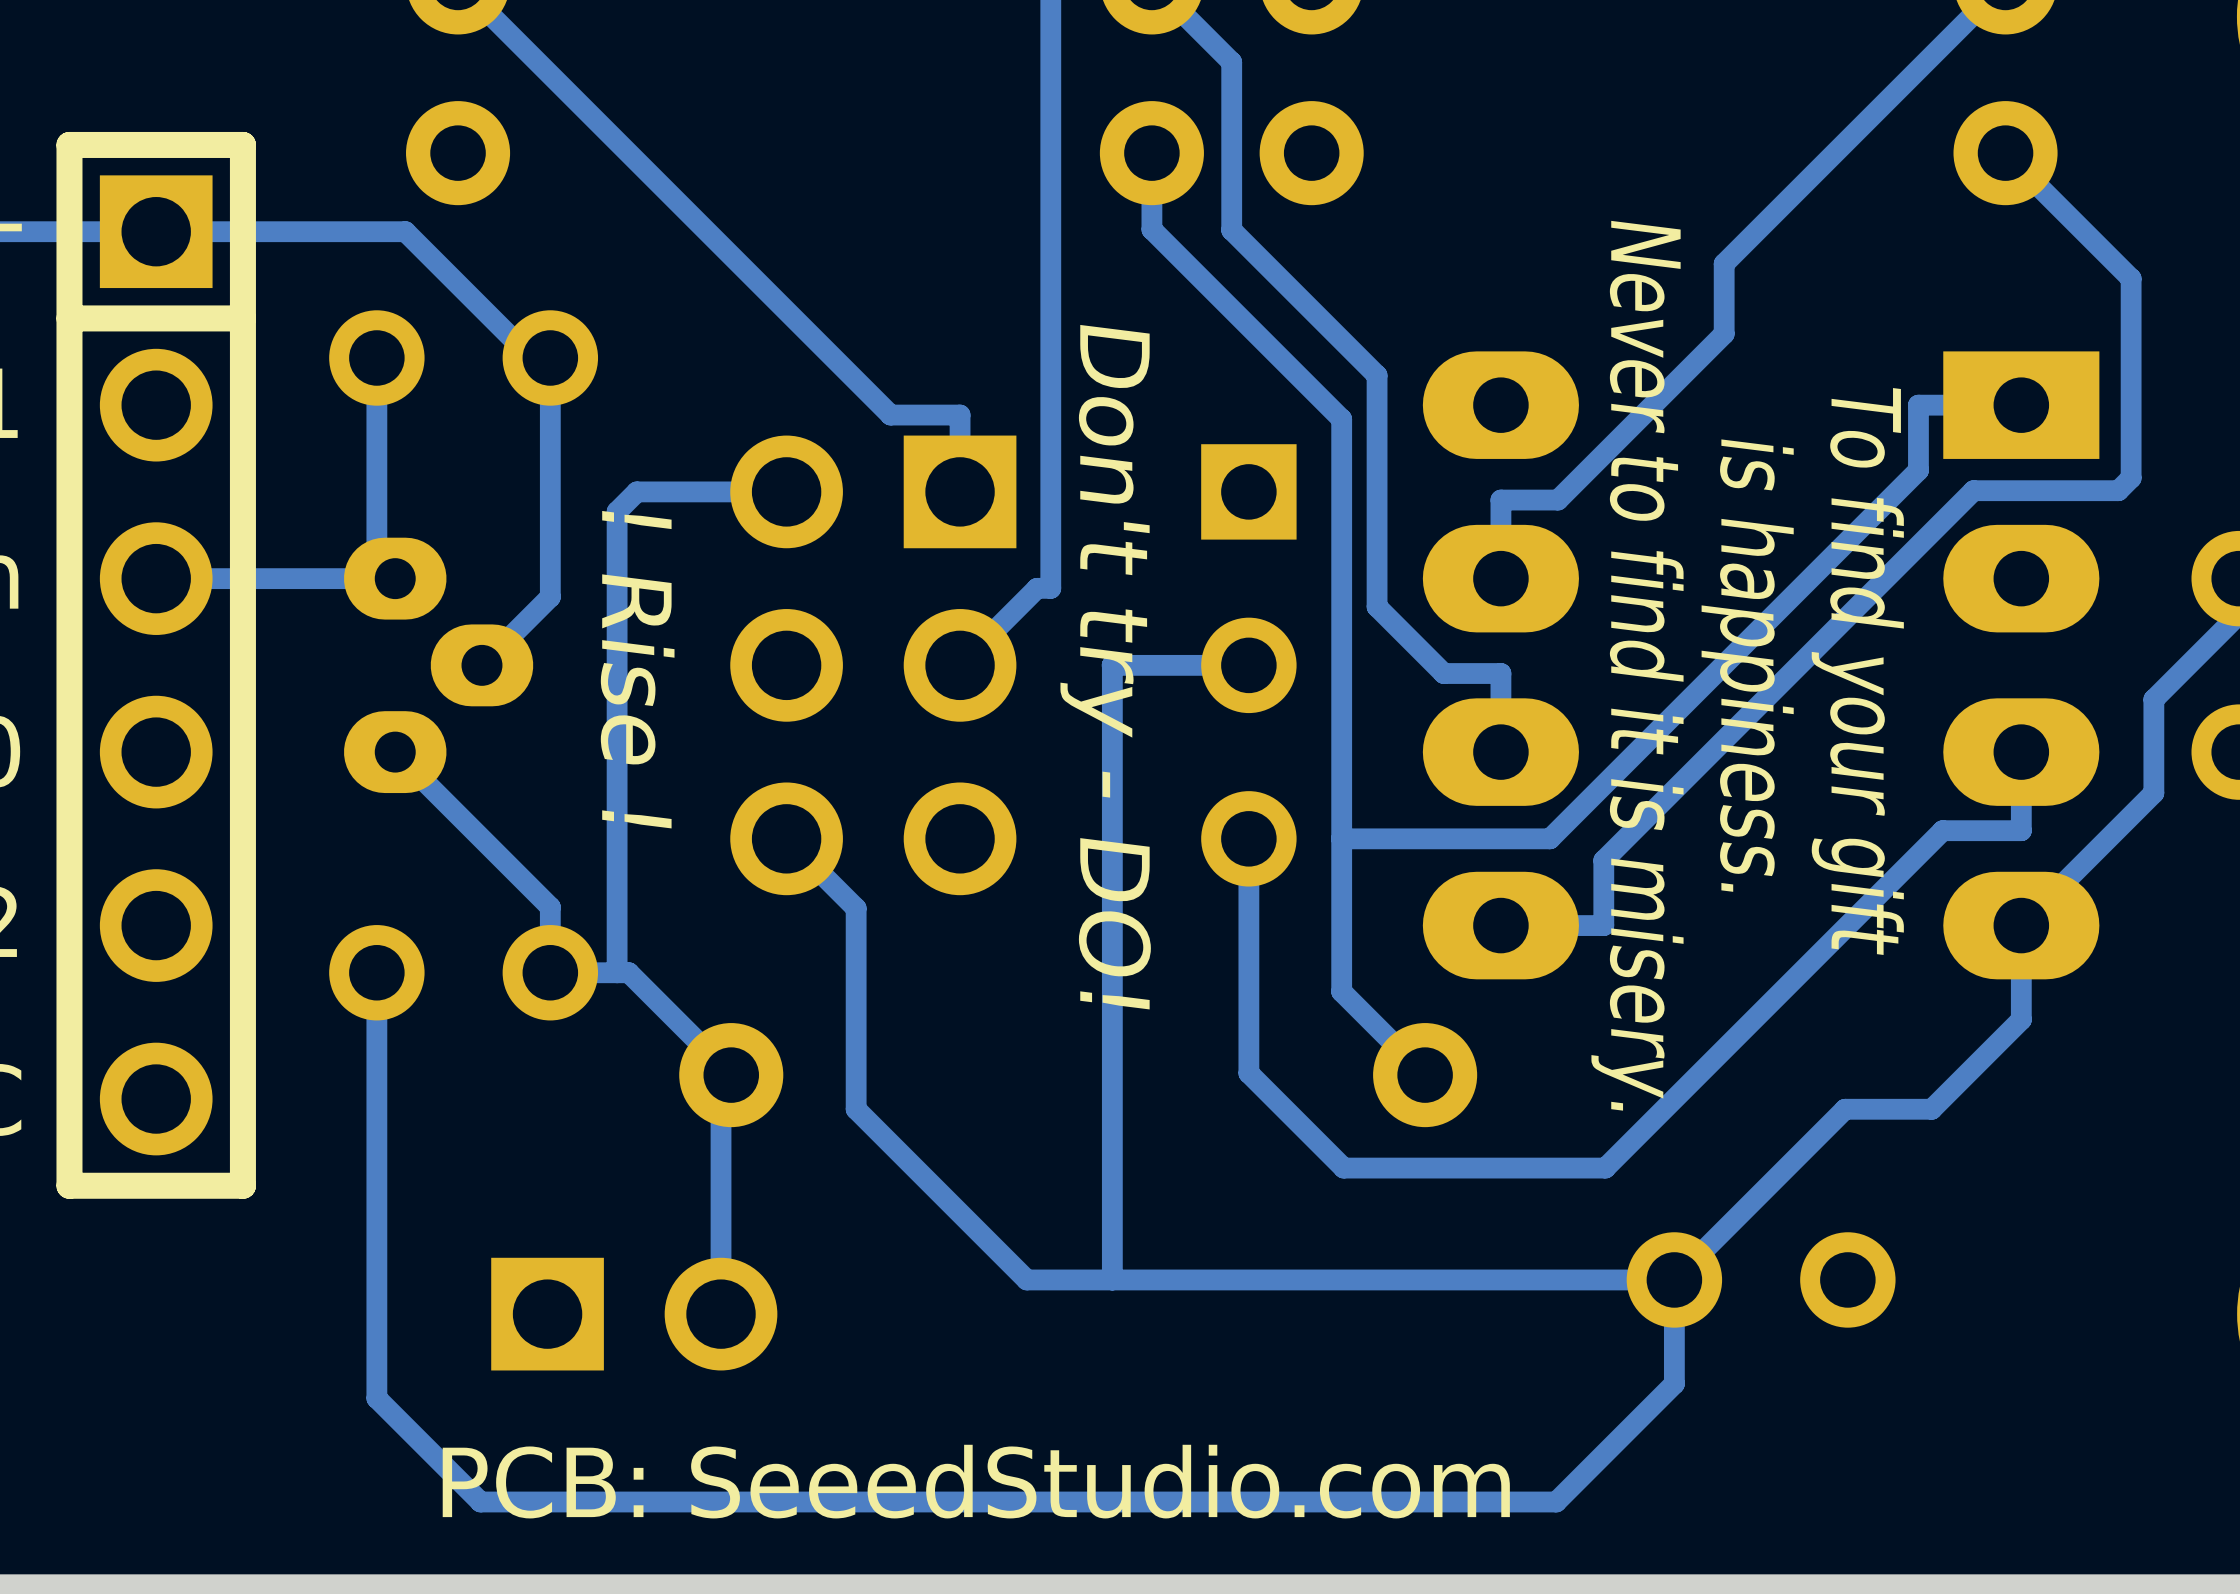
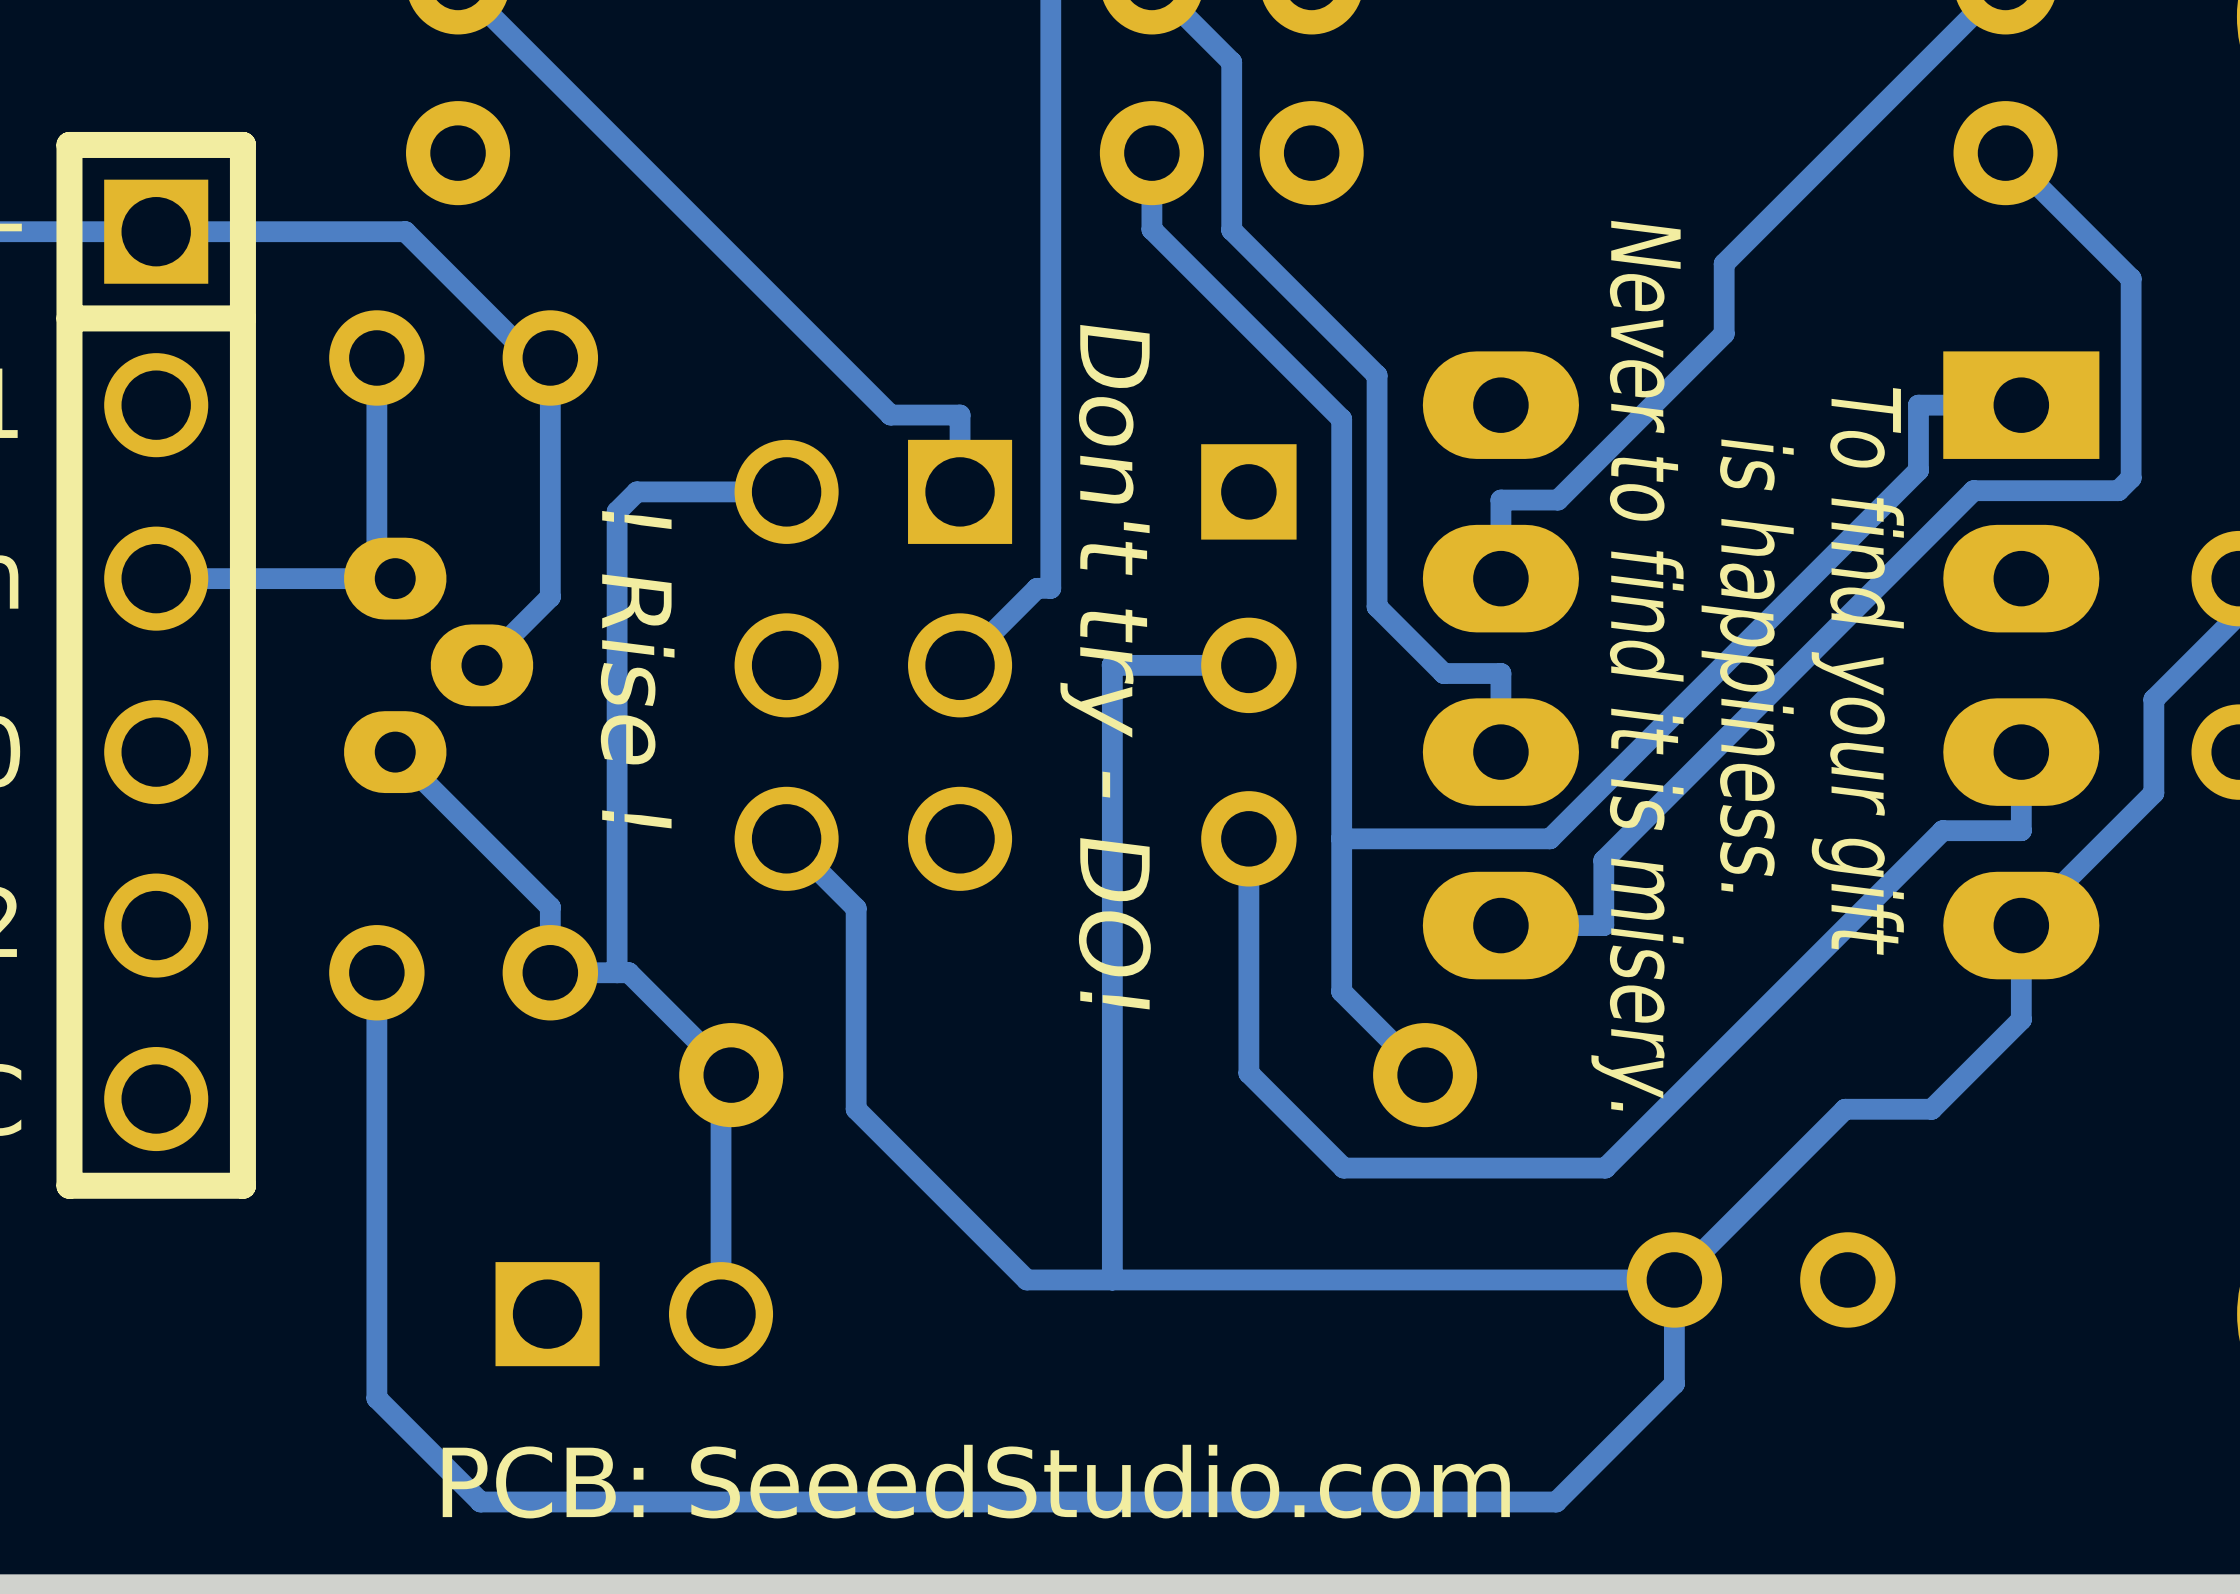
part footprint: [56, 131, 256, 1199] -> [56, 131, 256, 1199]
part footprint: [730, 435, 1017, 896] -> [734, 439, 1013, 891]
part footprint: [491, 1257, 778, 1371] -> [495, 1262, 774, 1367]

